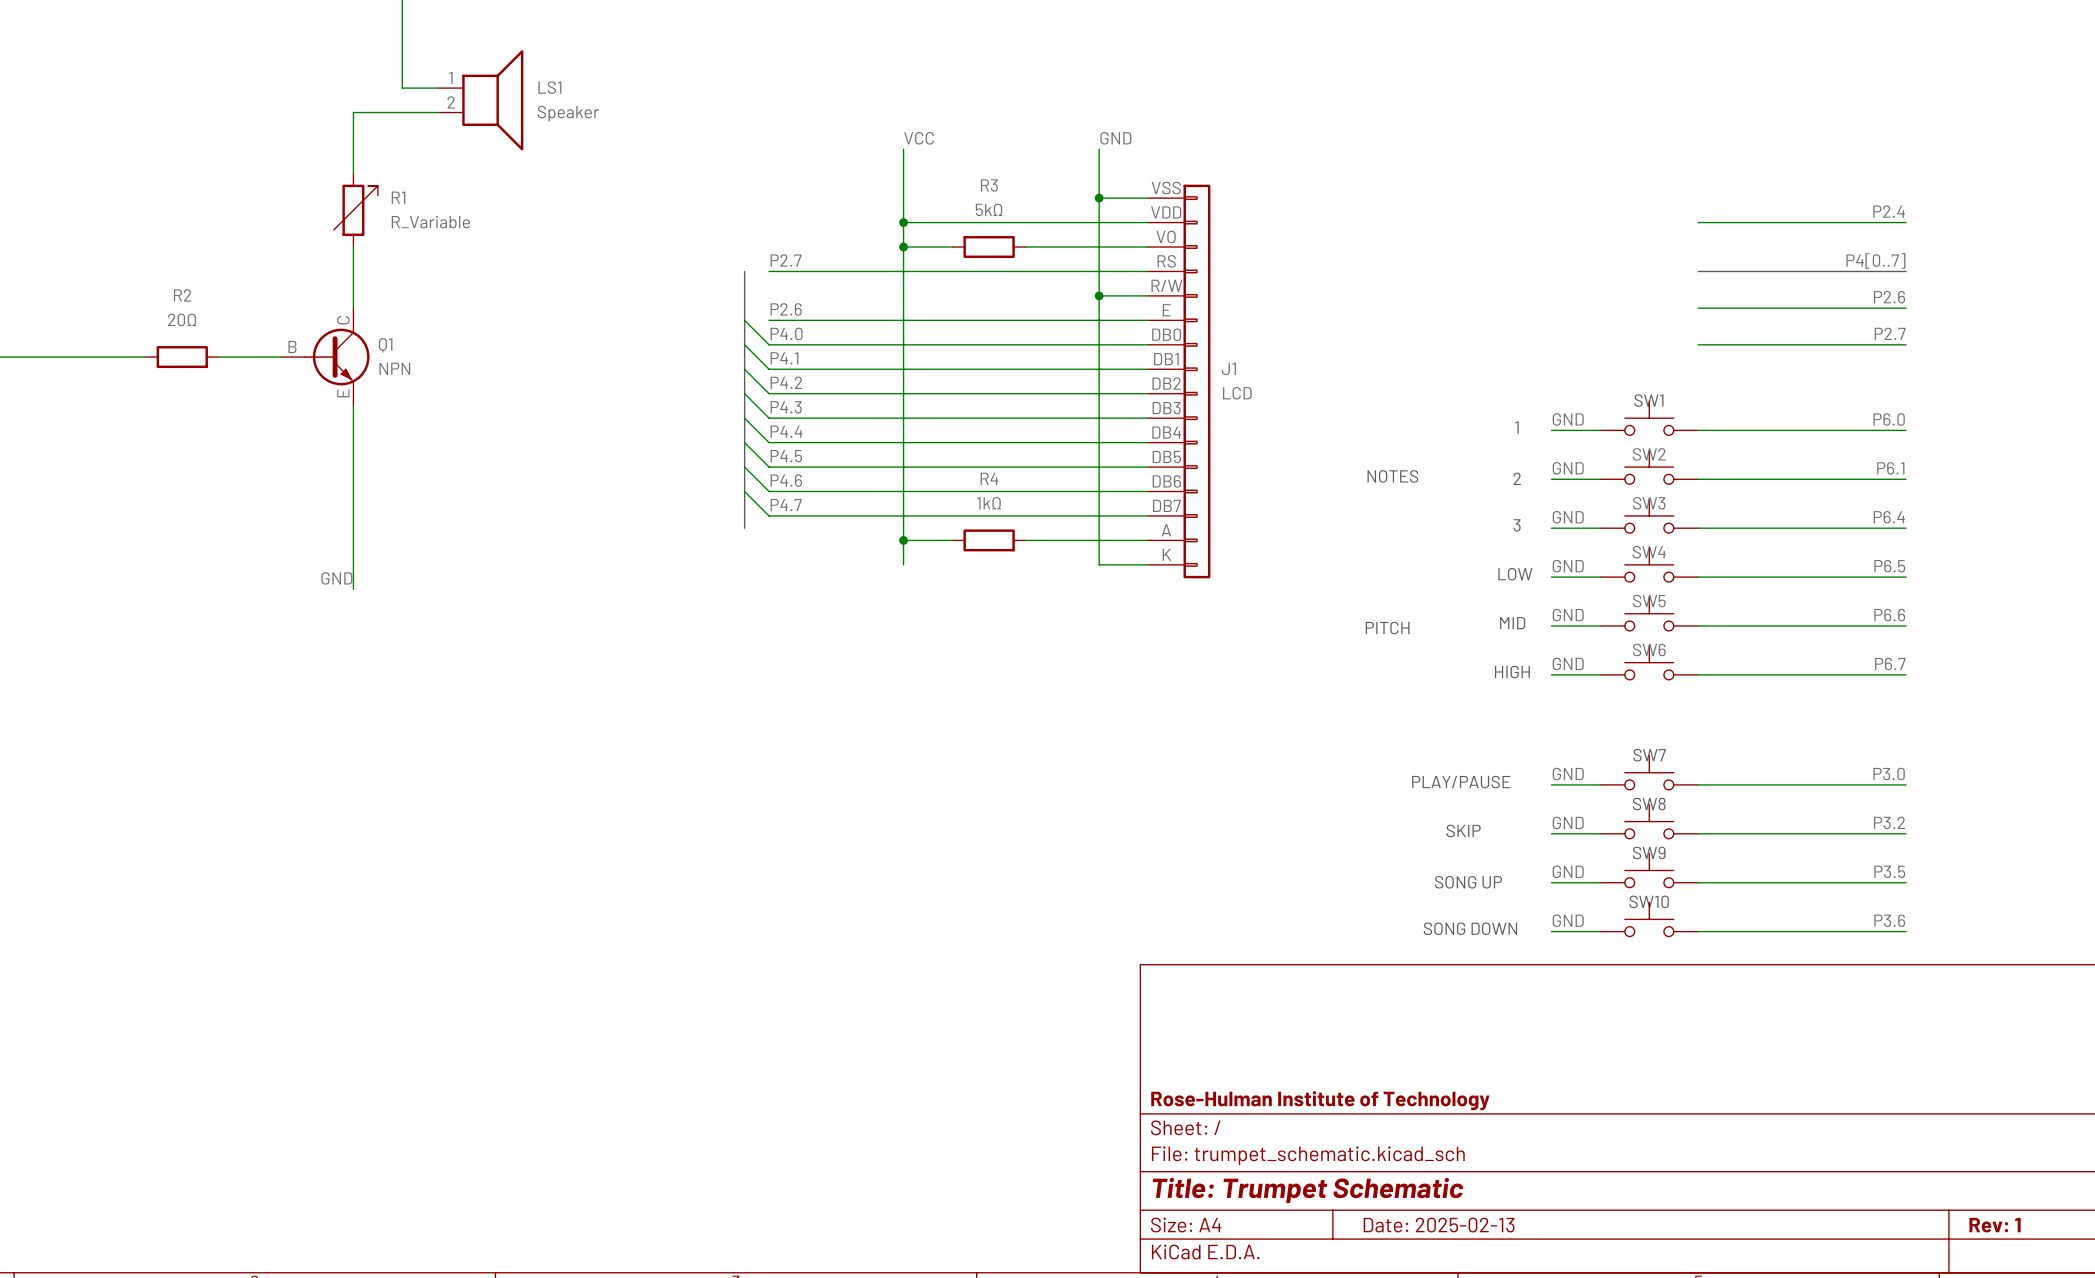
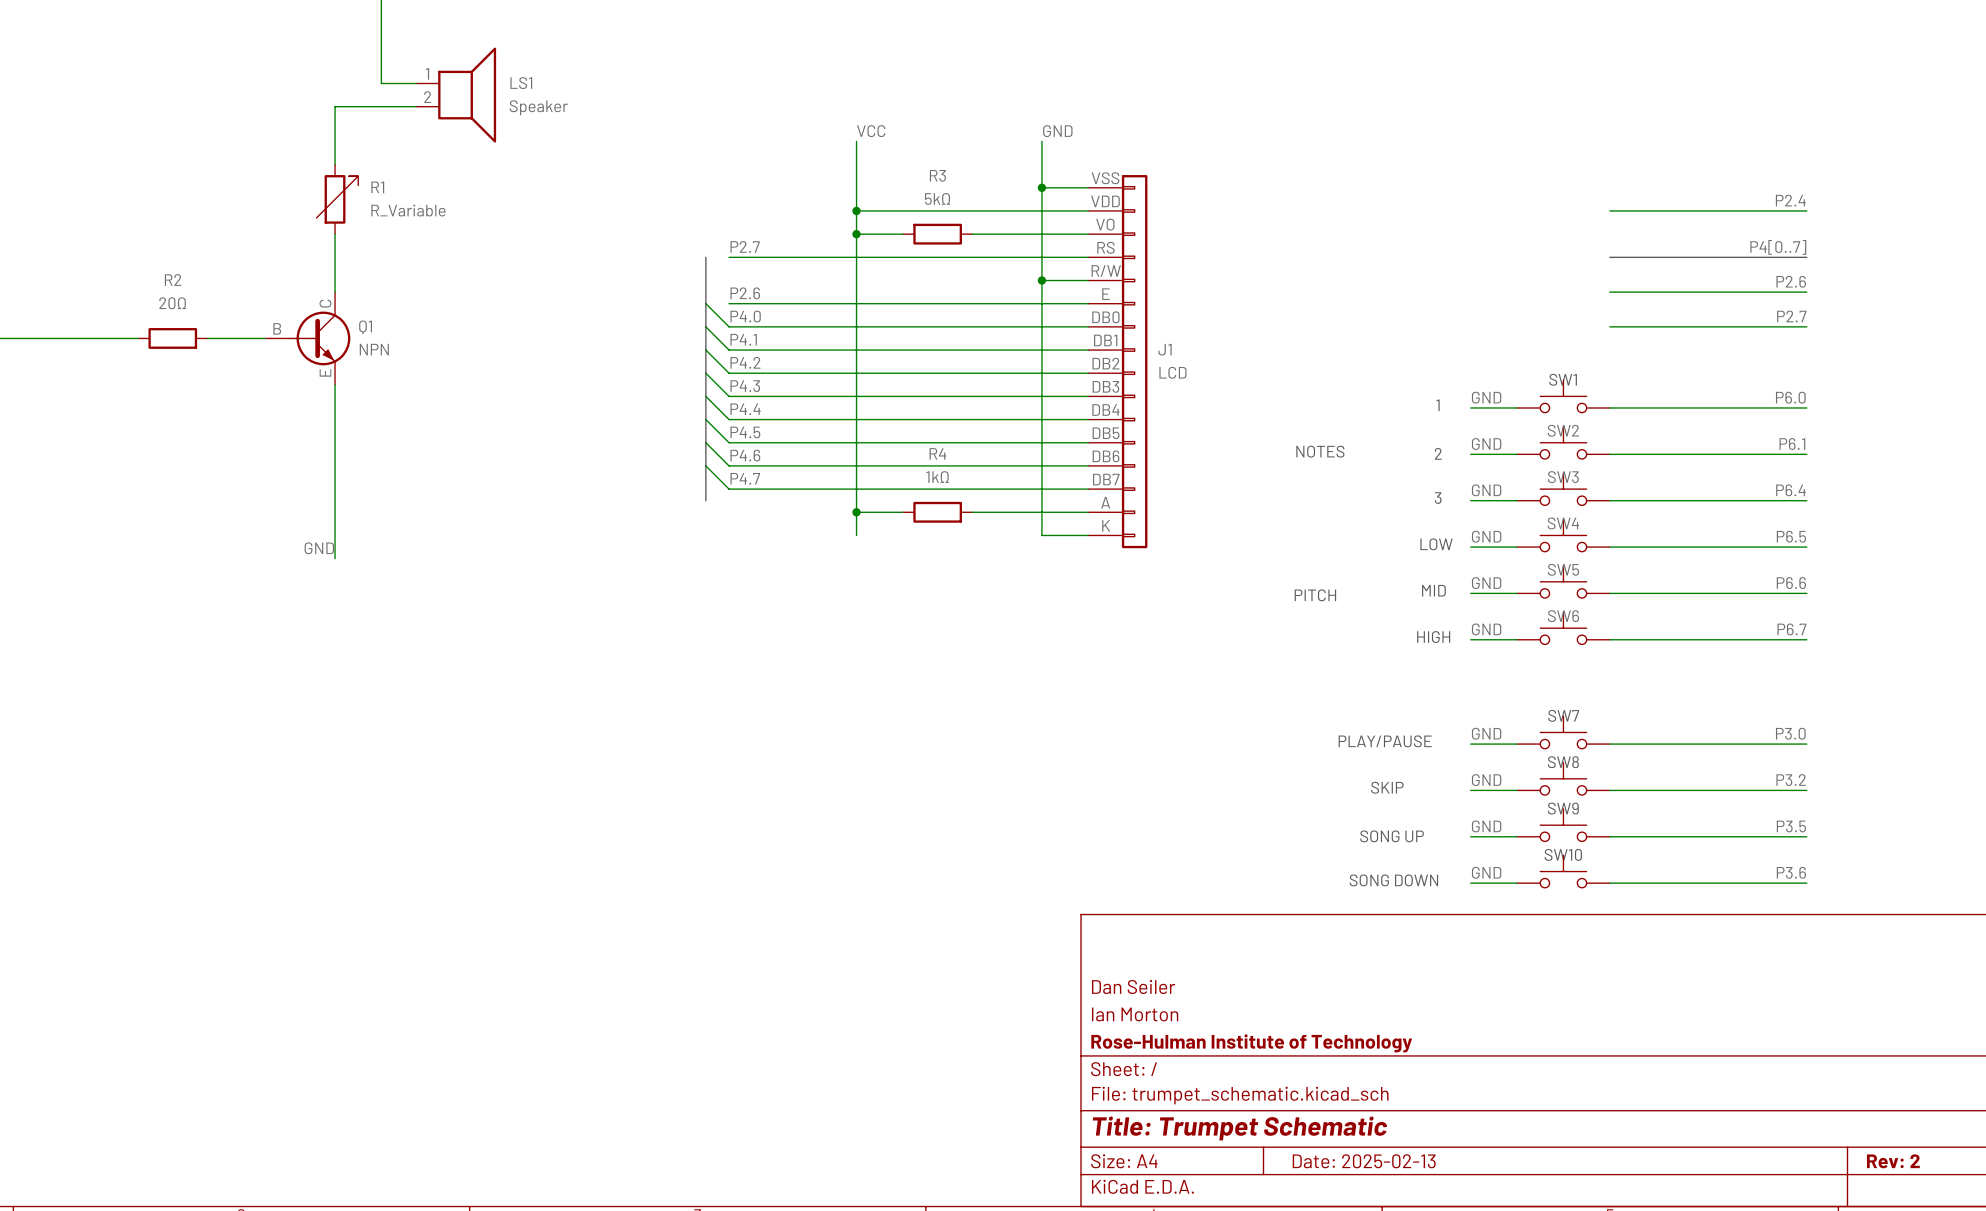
title block: none -> Dan Seiler (1133, 987)
title block: none -> Ian Morton (1135, 1014)
title block: Rev: 1 (1995, 1225) -> Rev: 2 (1893, 1161)

